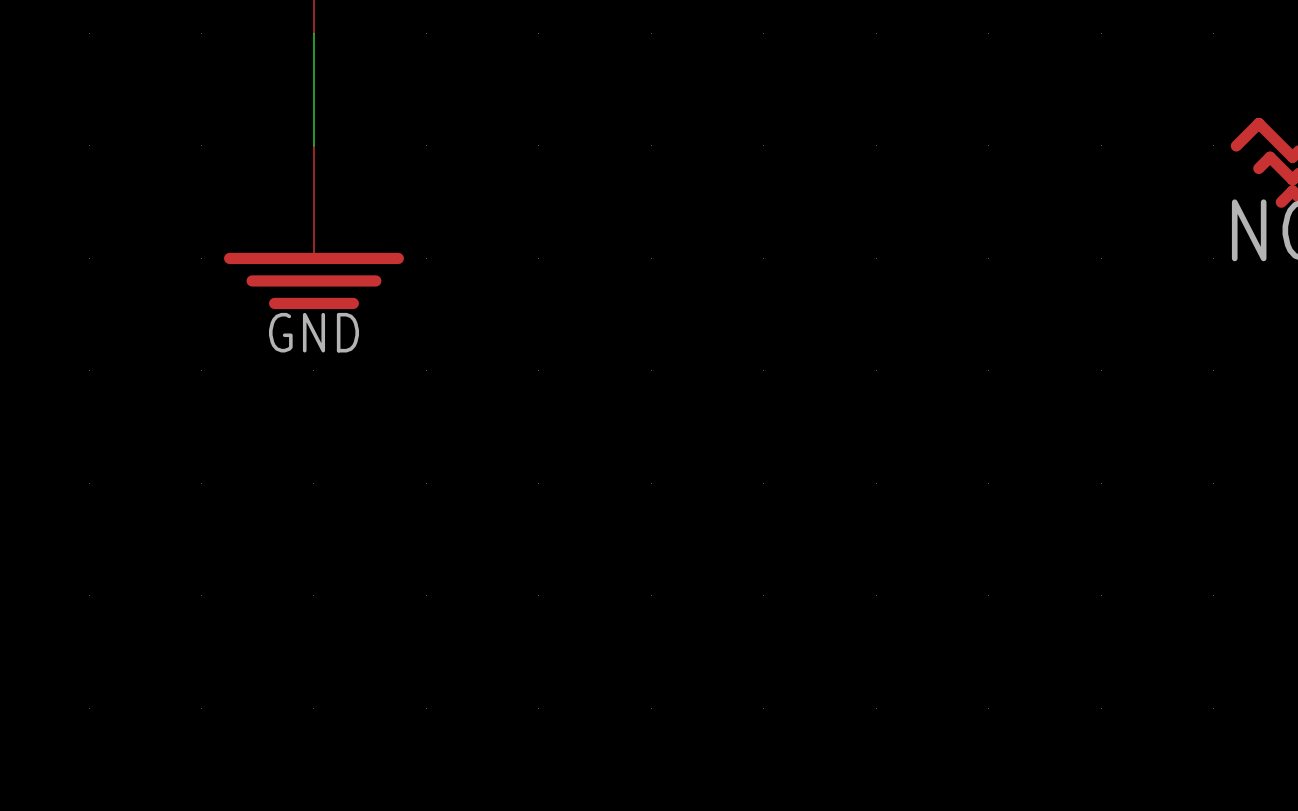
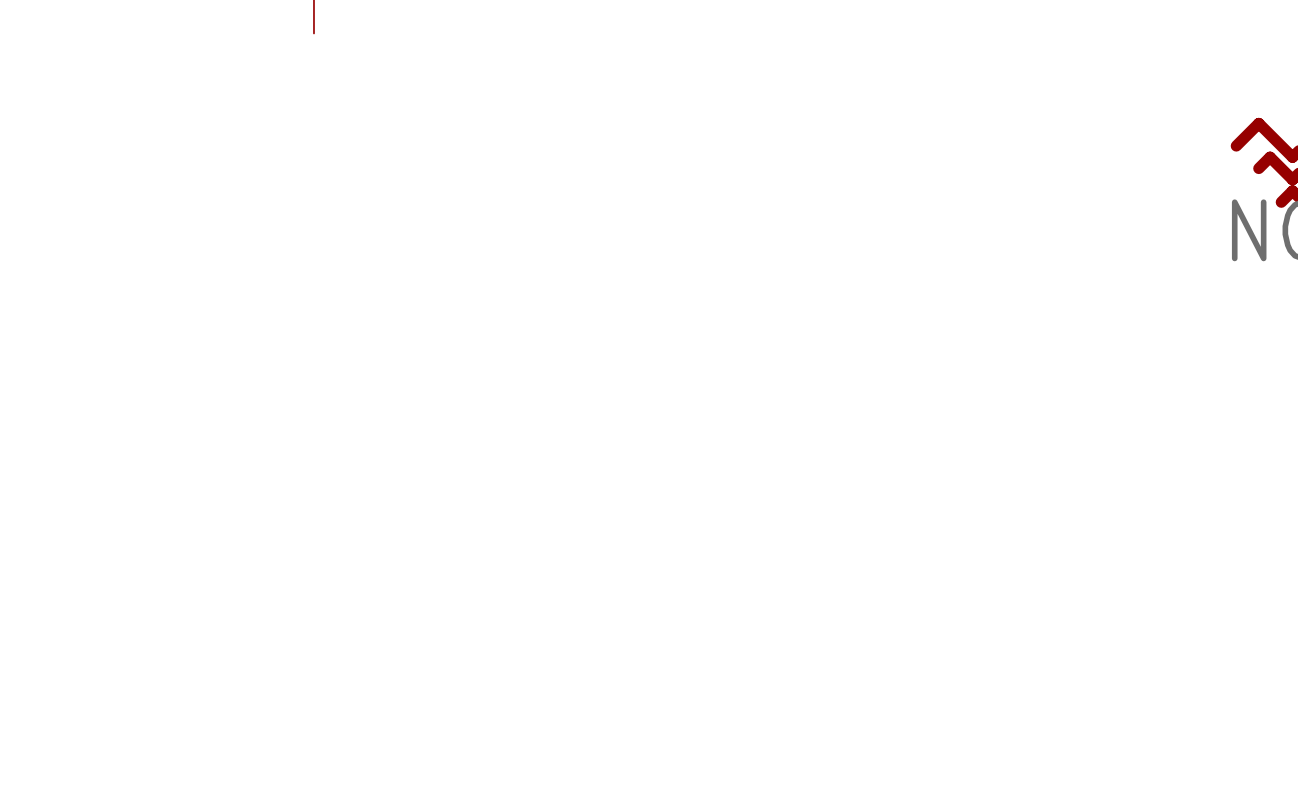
wire: (313, 33) (313, 145) -> none
power symbol: (313, 227) -> none

